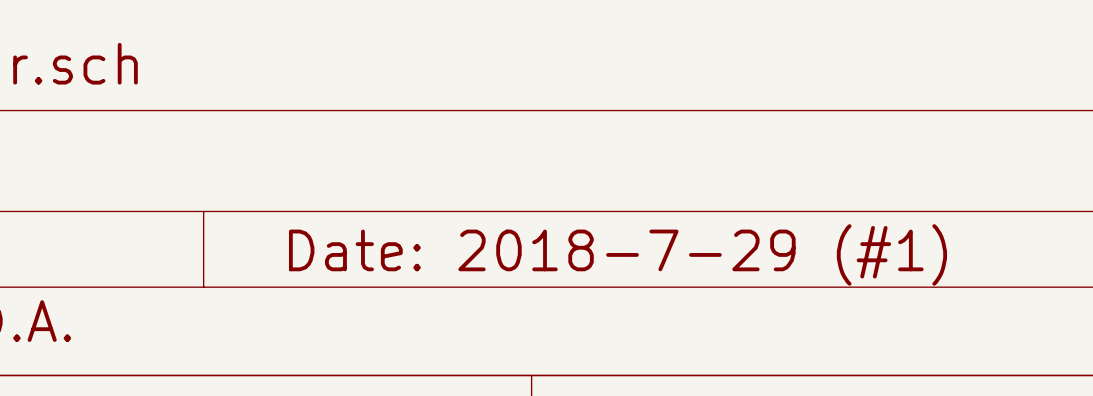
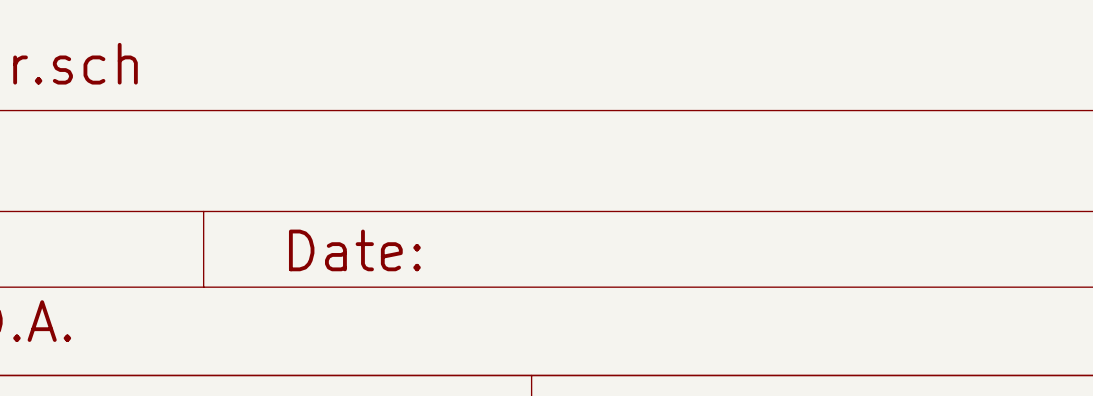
title block: Date: 2018-7-29 (#1) (617, 254) -> Date: (354, 250)

